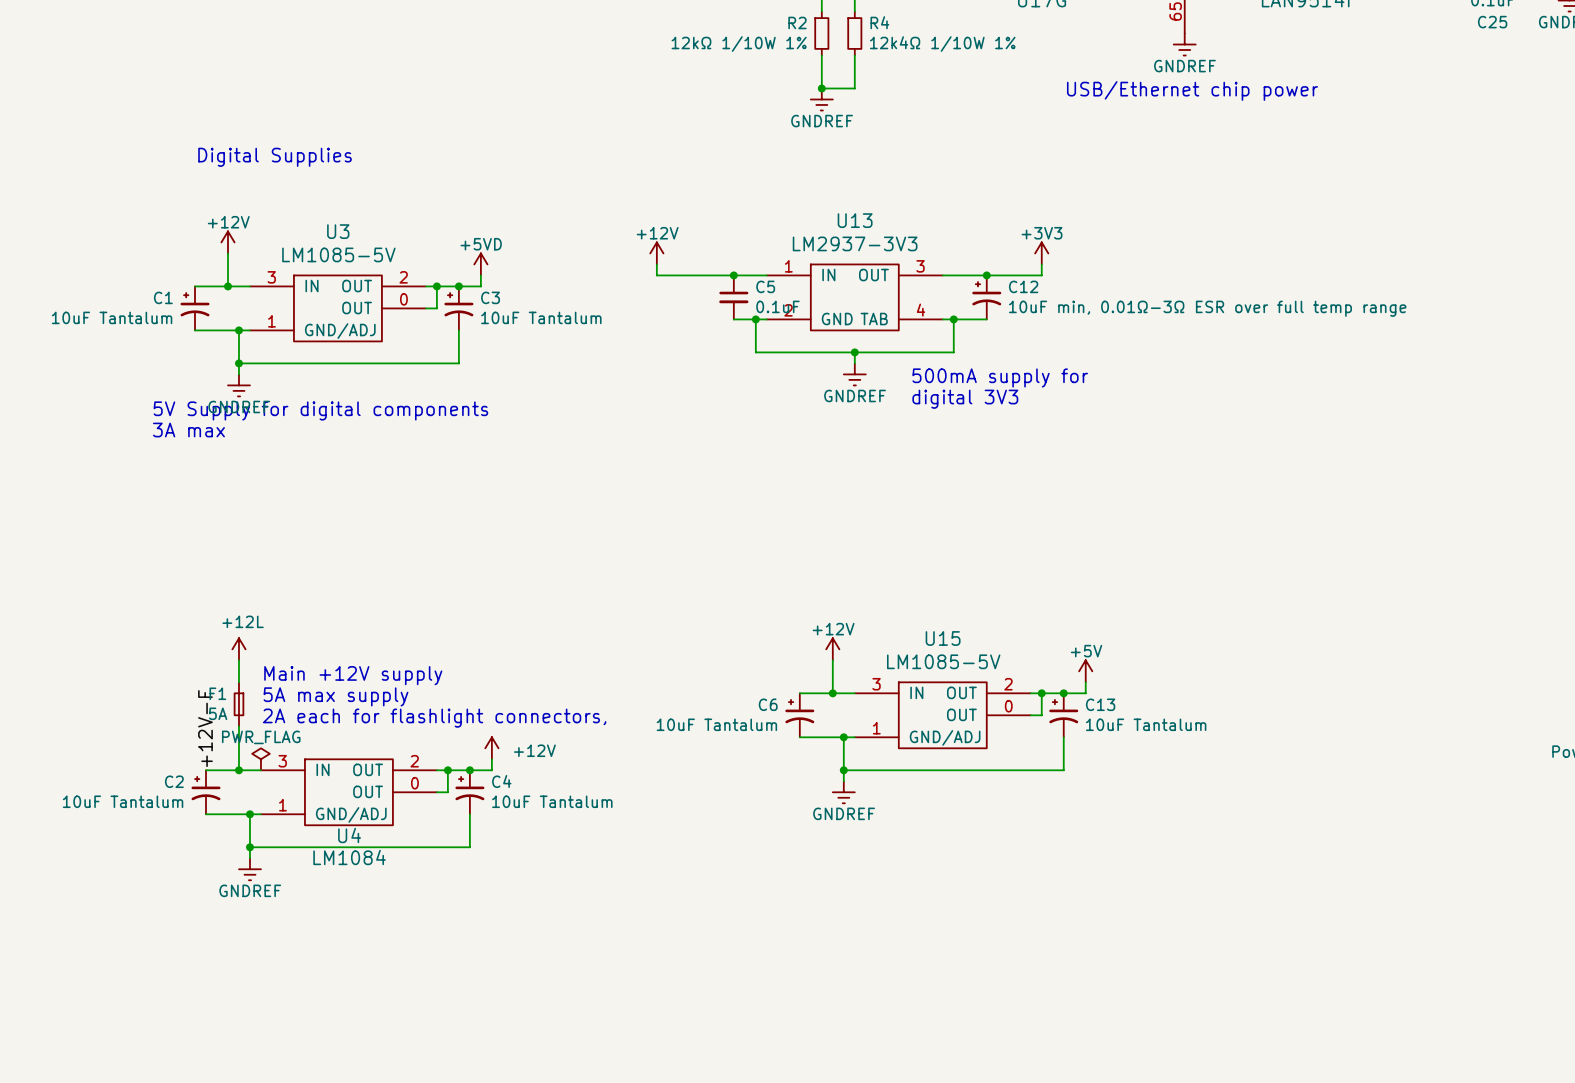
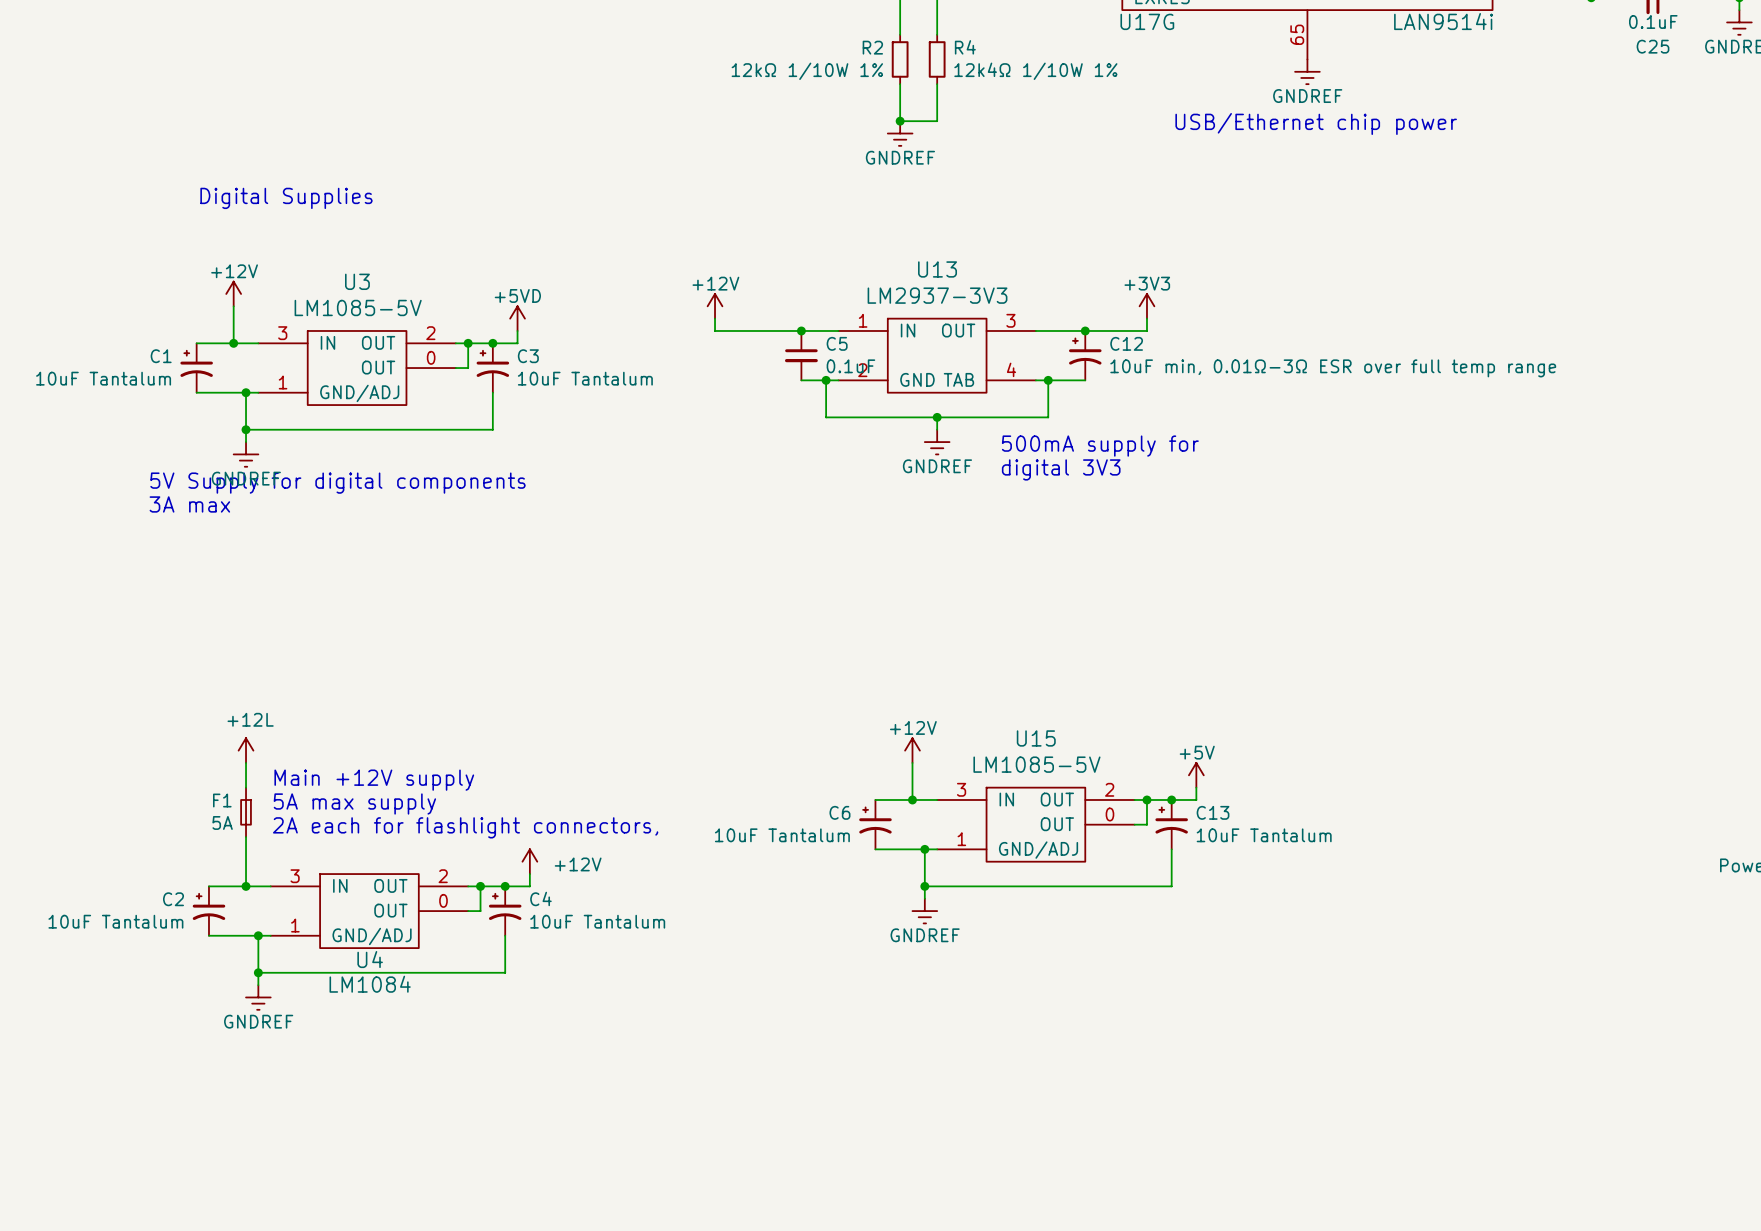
label: +12V-F (205, 728) -> none
power symbol: PWR_FLAG (260, 759) -> none

